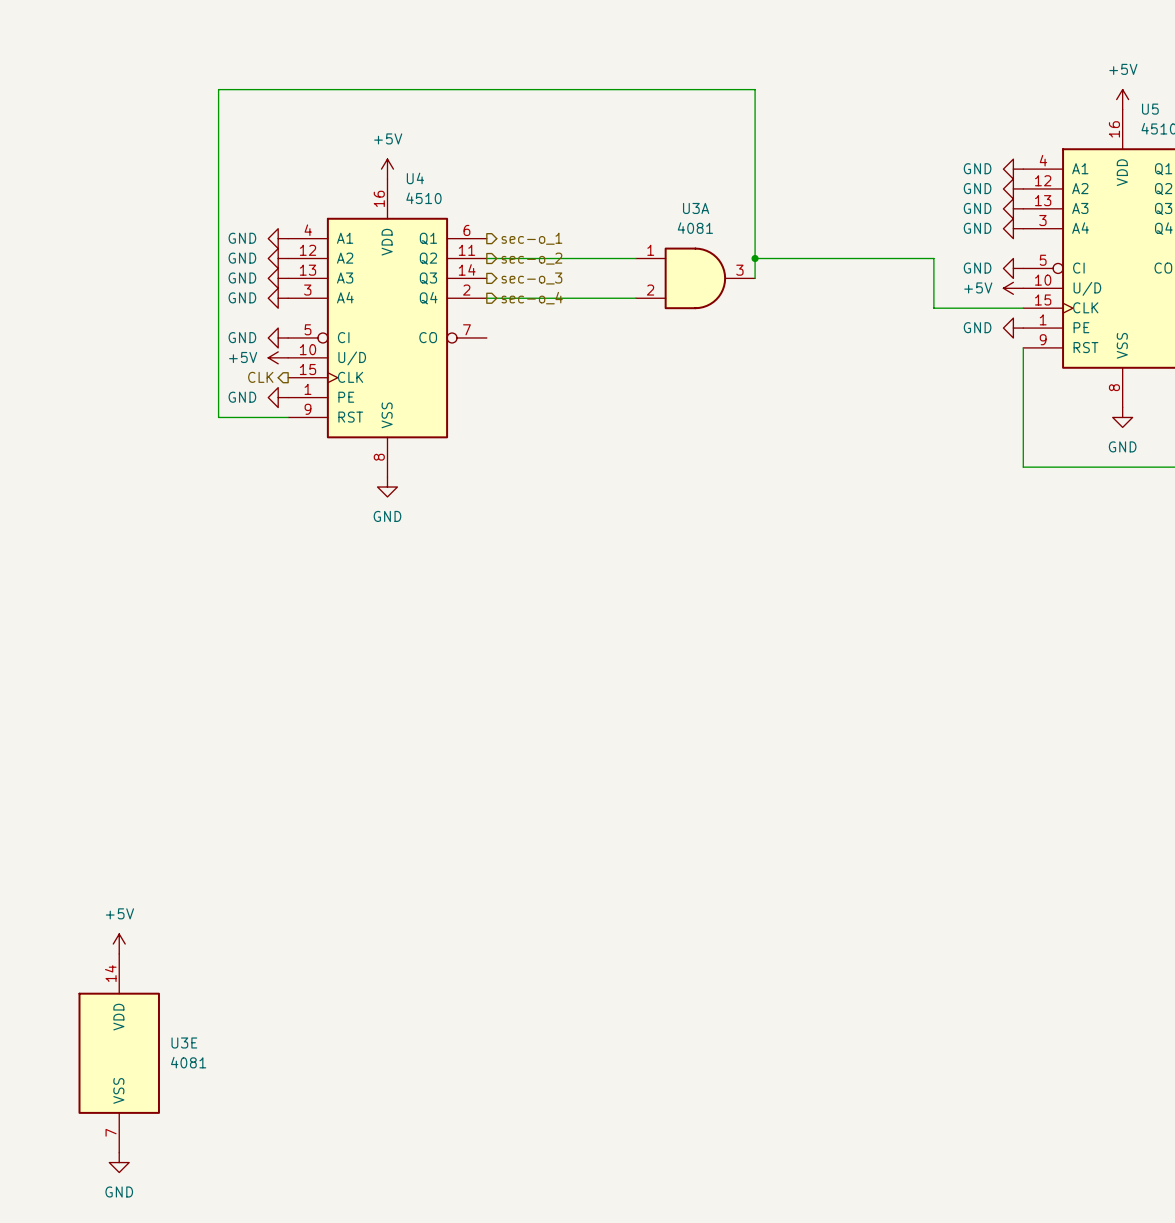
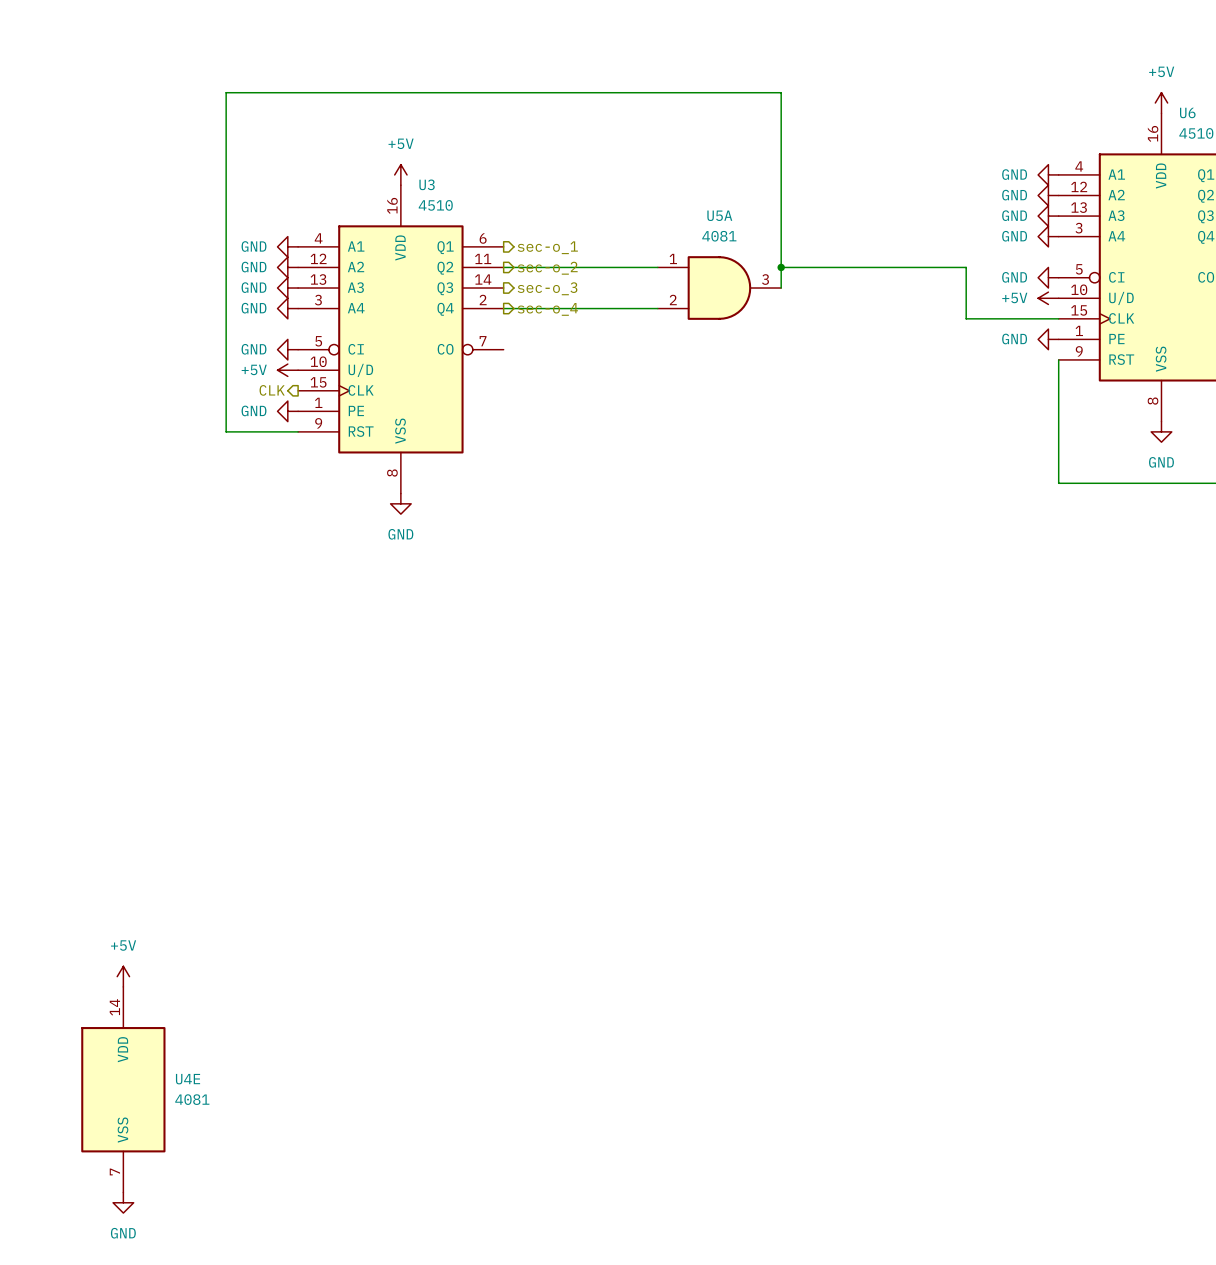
U5 name: U5 (1150, 109) -> U6 (1187, 112)
U4 name: U4 (415, 178) -> U3 (427, 184)
U3A name: U3A (696, 208) -> U5A (719, 215)
U3E name: U3E (184, 1042) -> U4E (188, 1079)

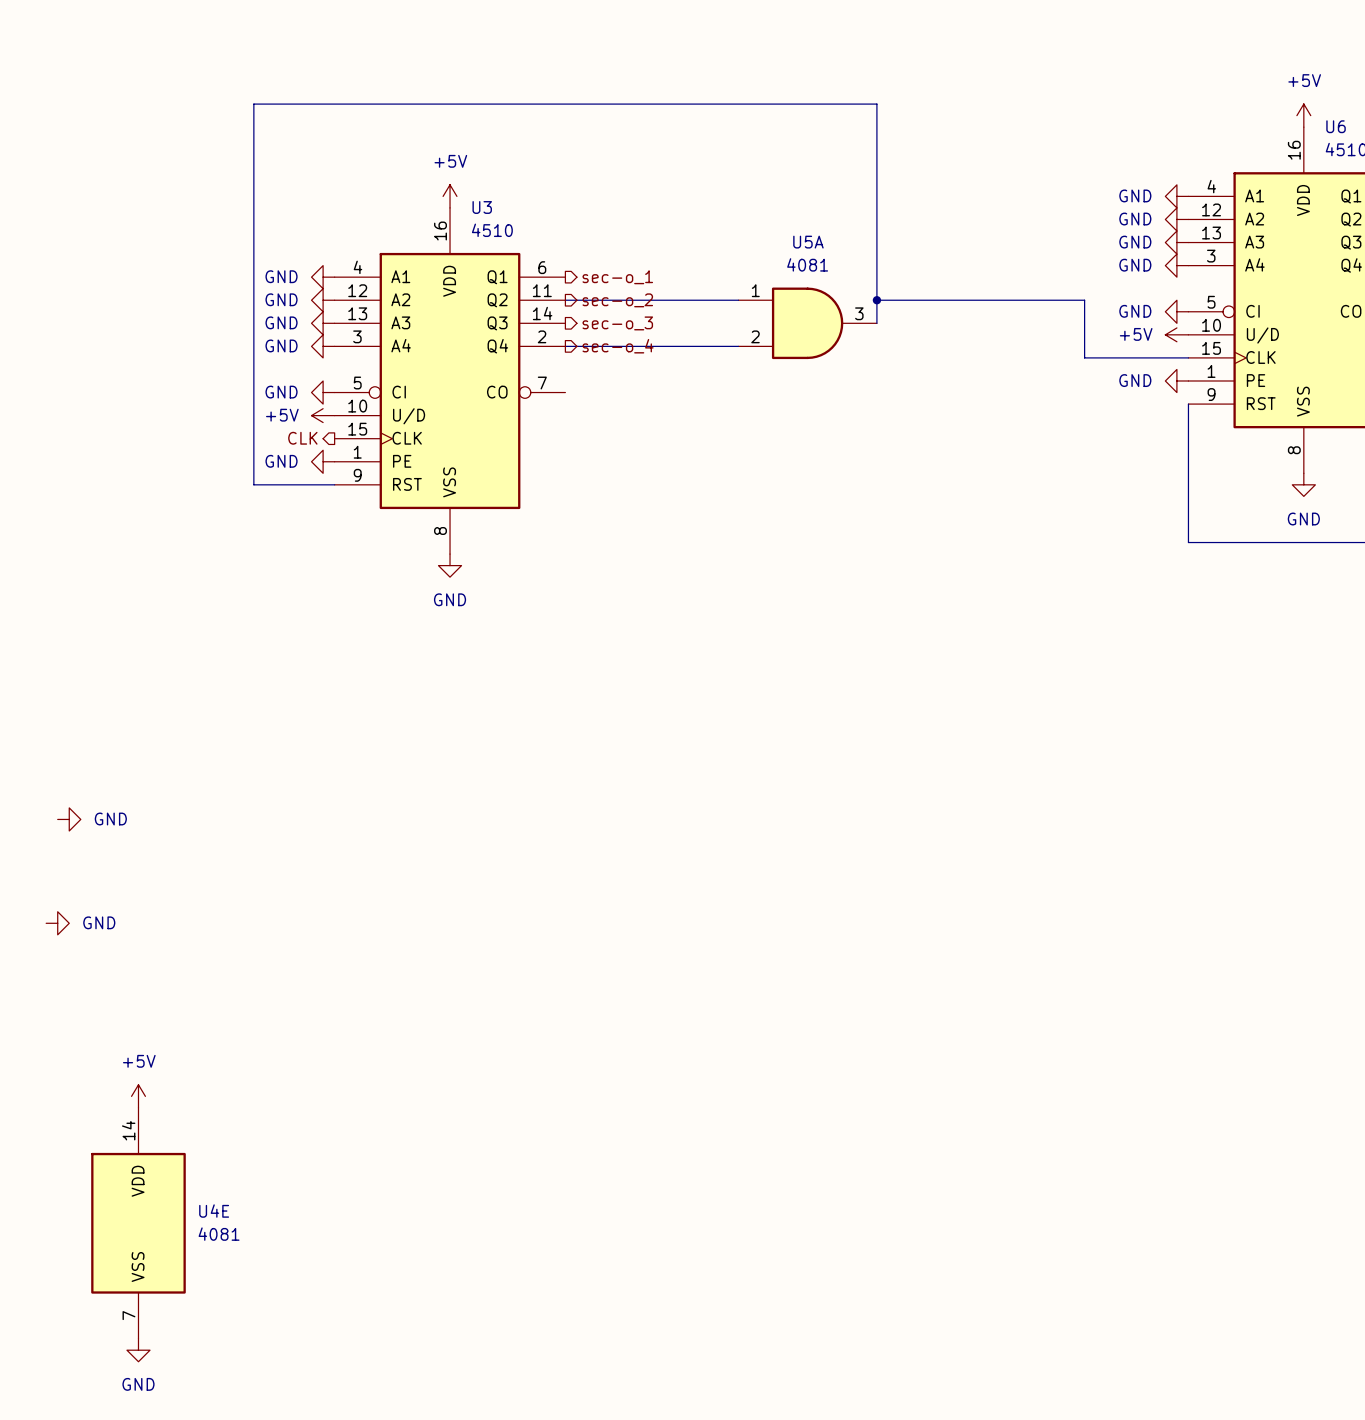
power symbol: none -> GND (69, 819)
power symbol: none -> GND (57, 923)

